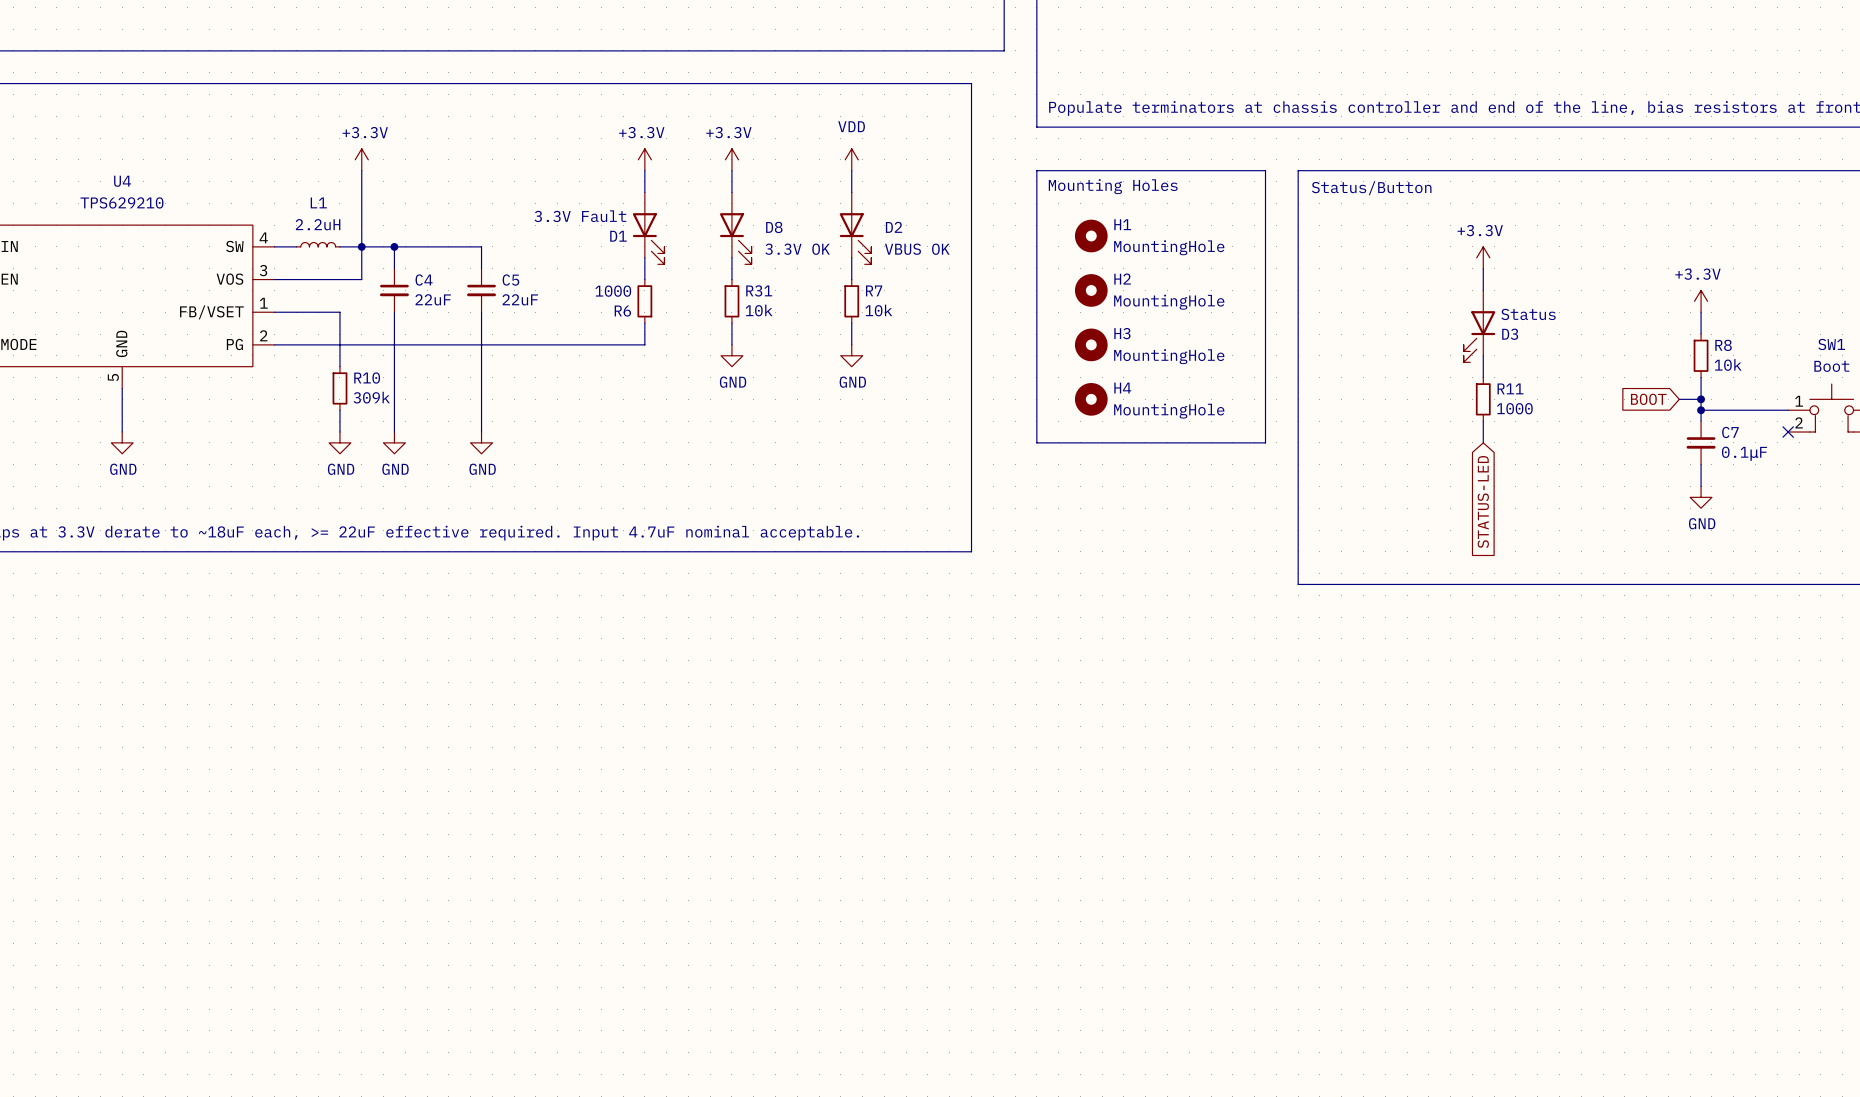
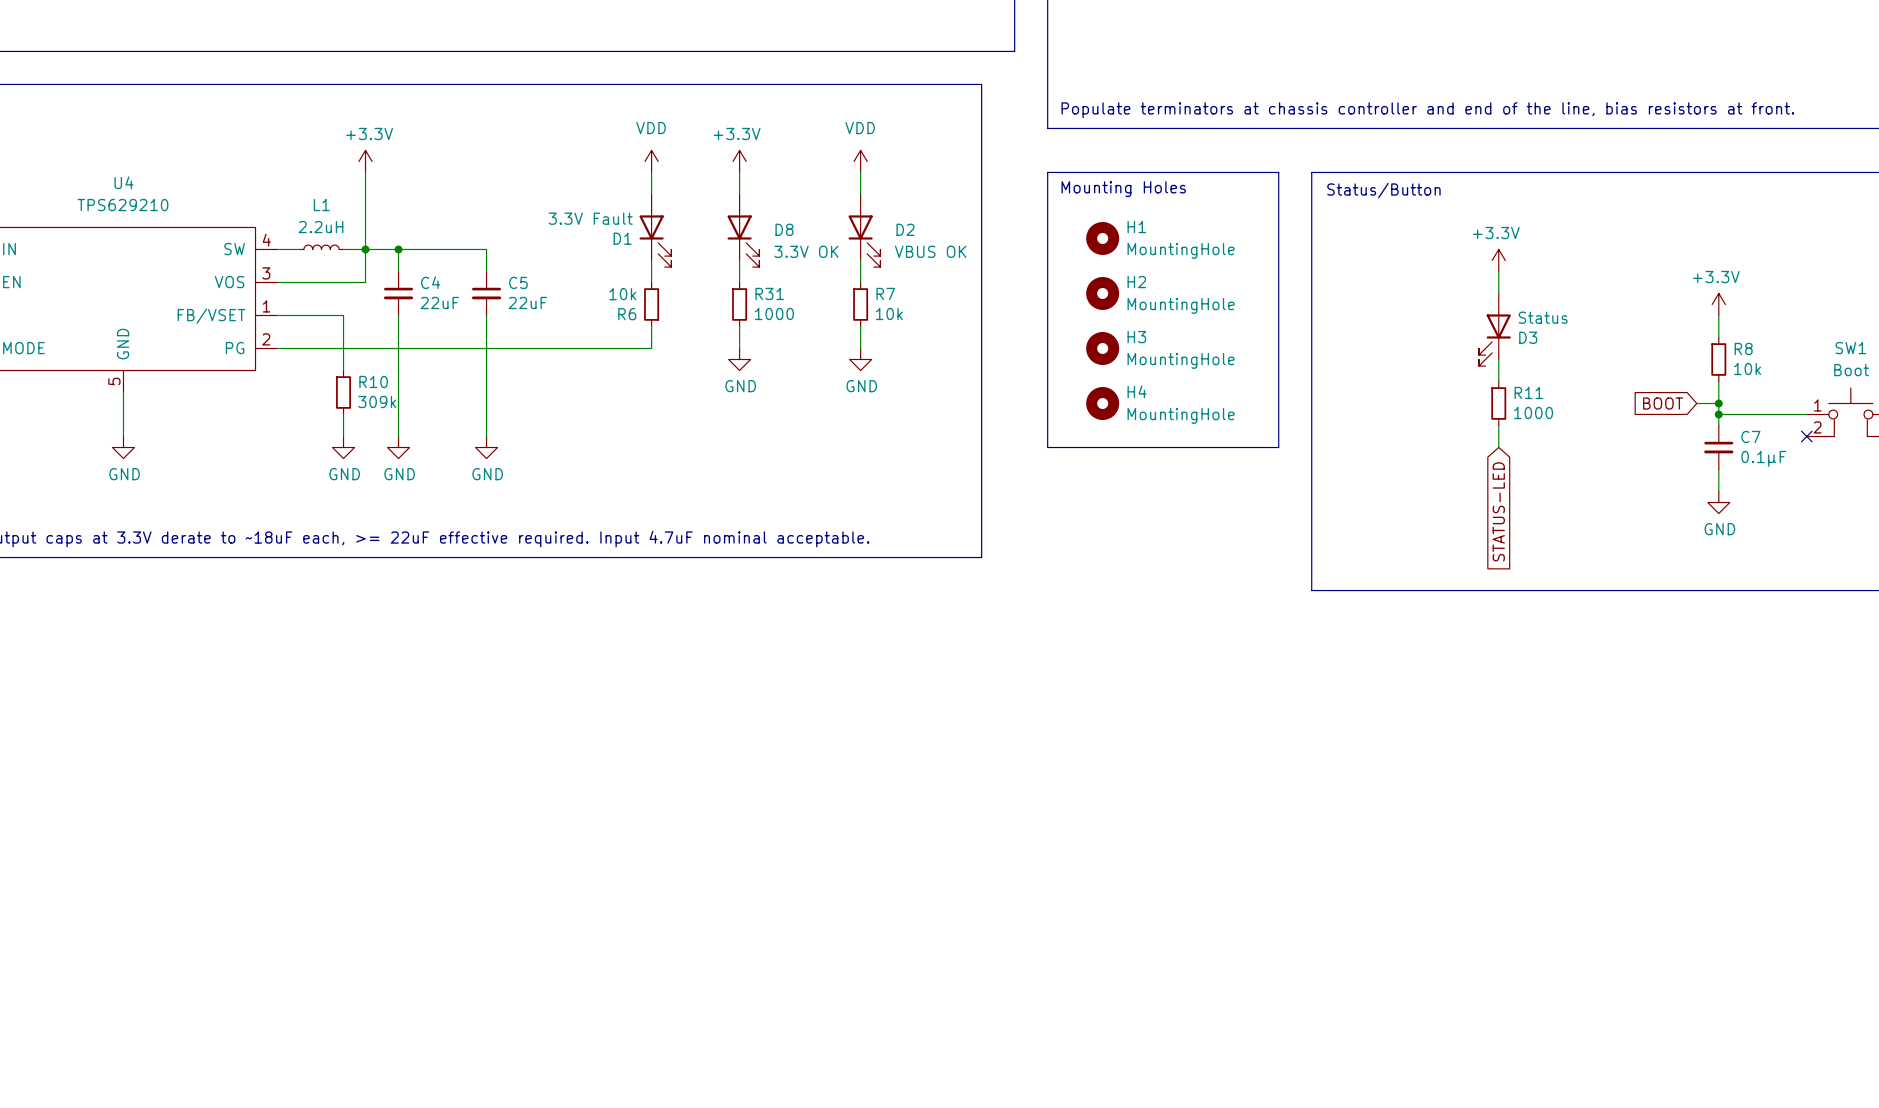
power symbol: +3.3V (644, 159) -> VDD (651, 161)
R6 value: 1000 (613, 291) -> 10k (622, 294)
R31 value: 10k (759, 310) -> 1000 (774, 313)

